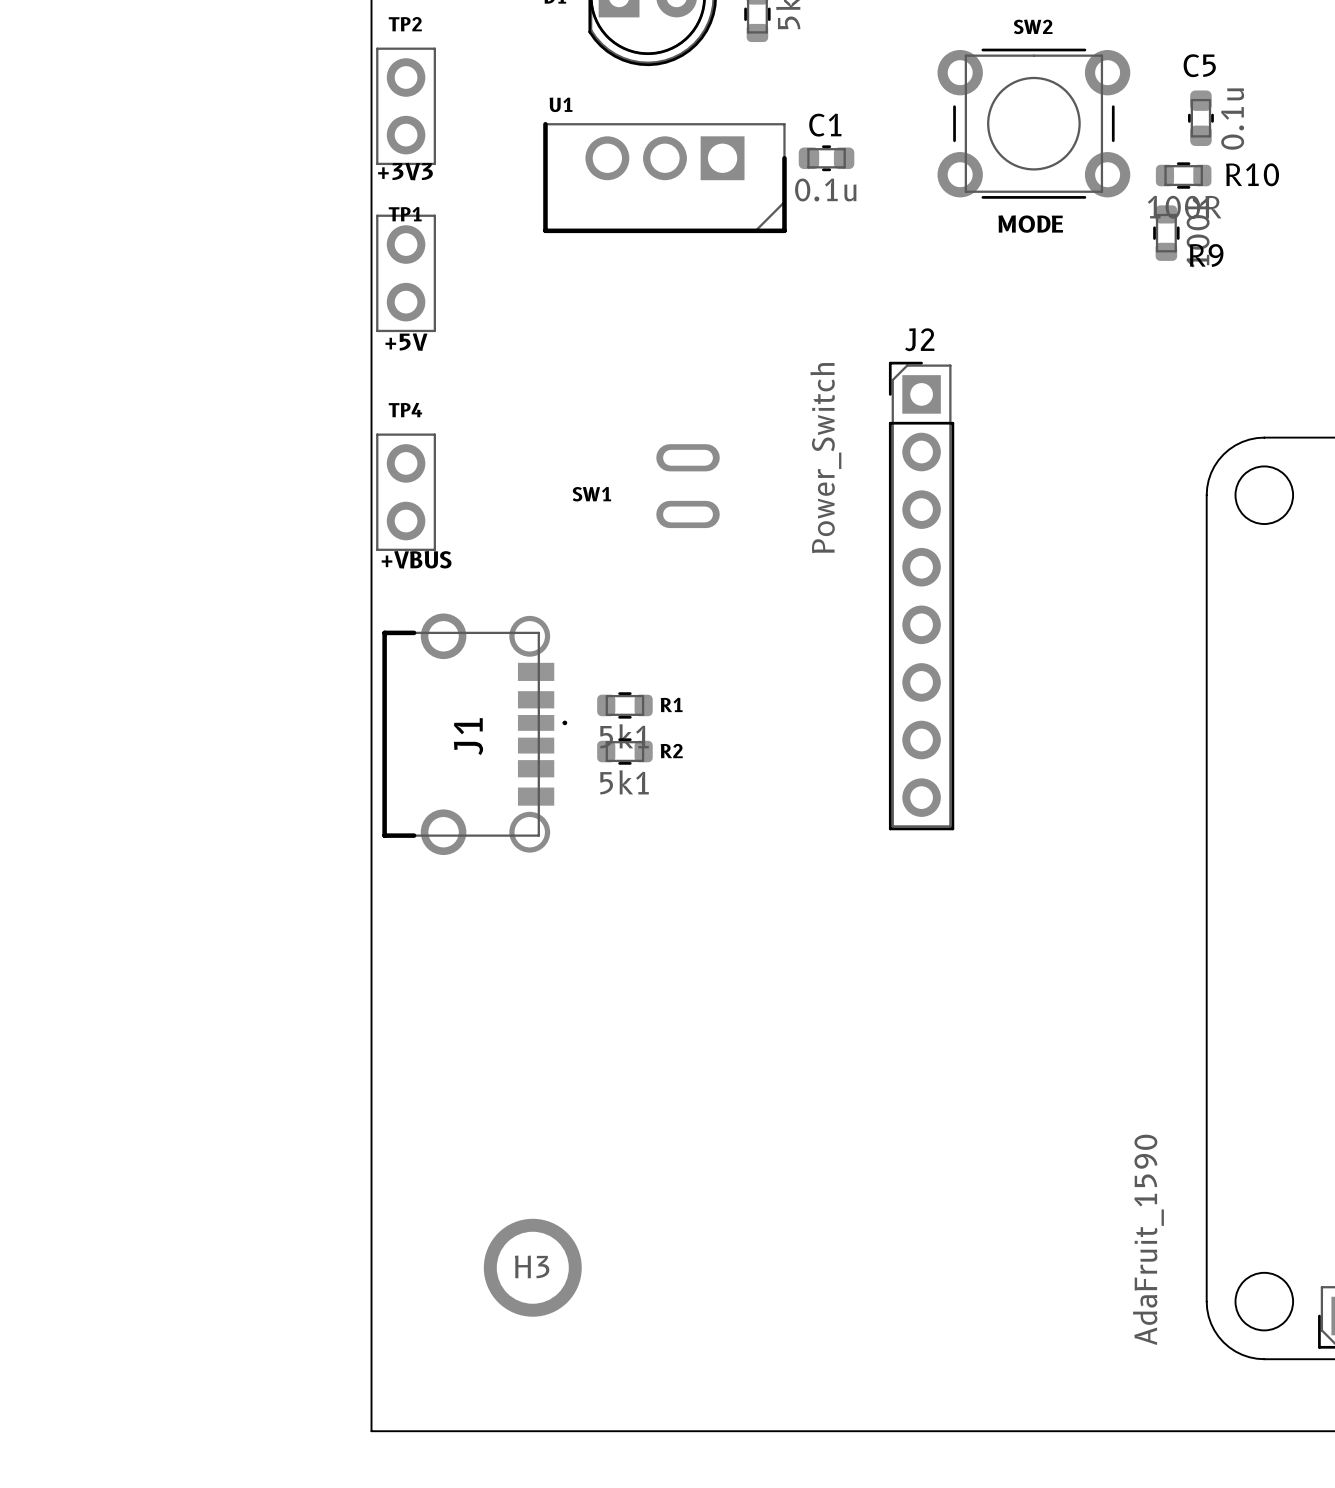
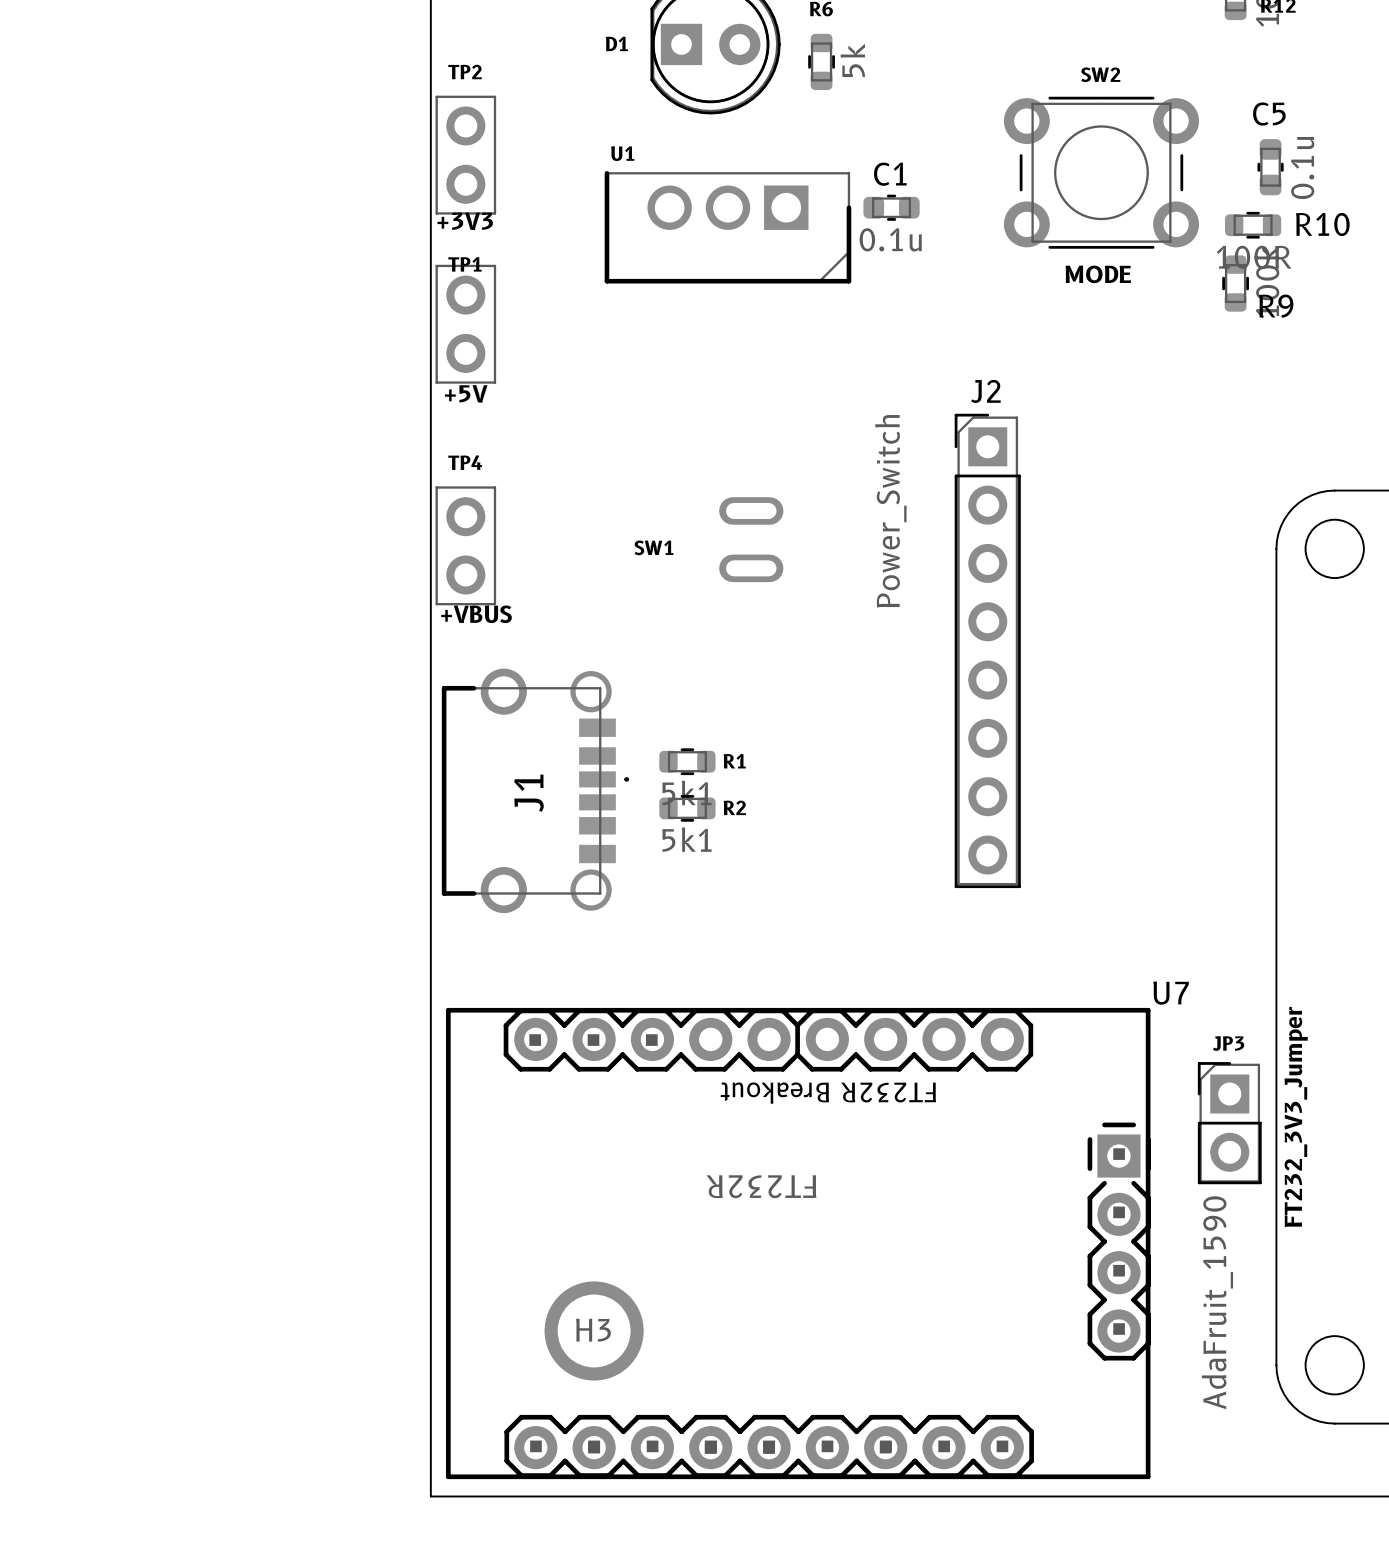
JP3: none -> FT232_3V3_Jumper (1229, 1123)
U7: none -> FT232R (798, 1243)

